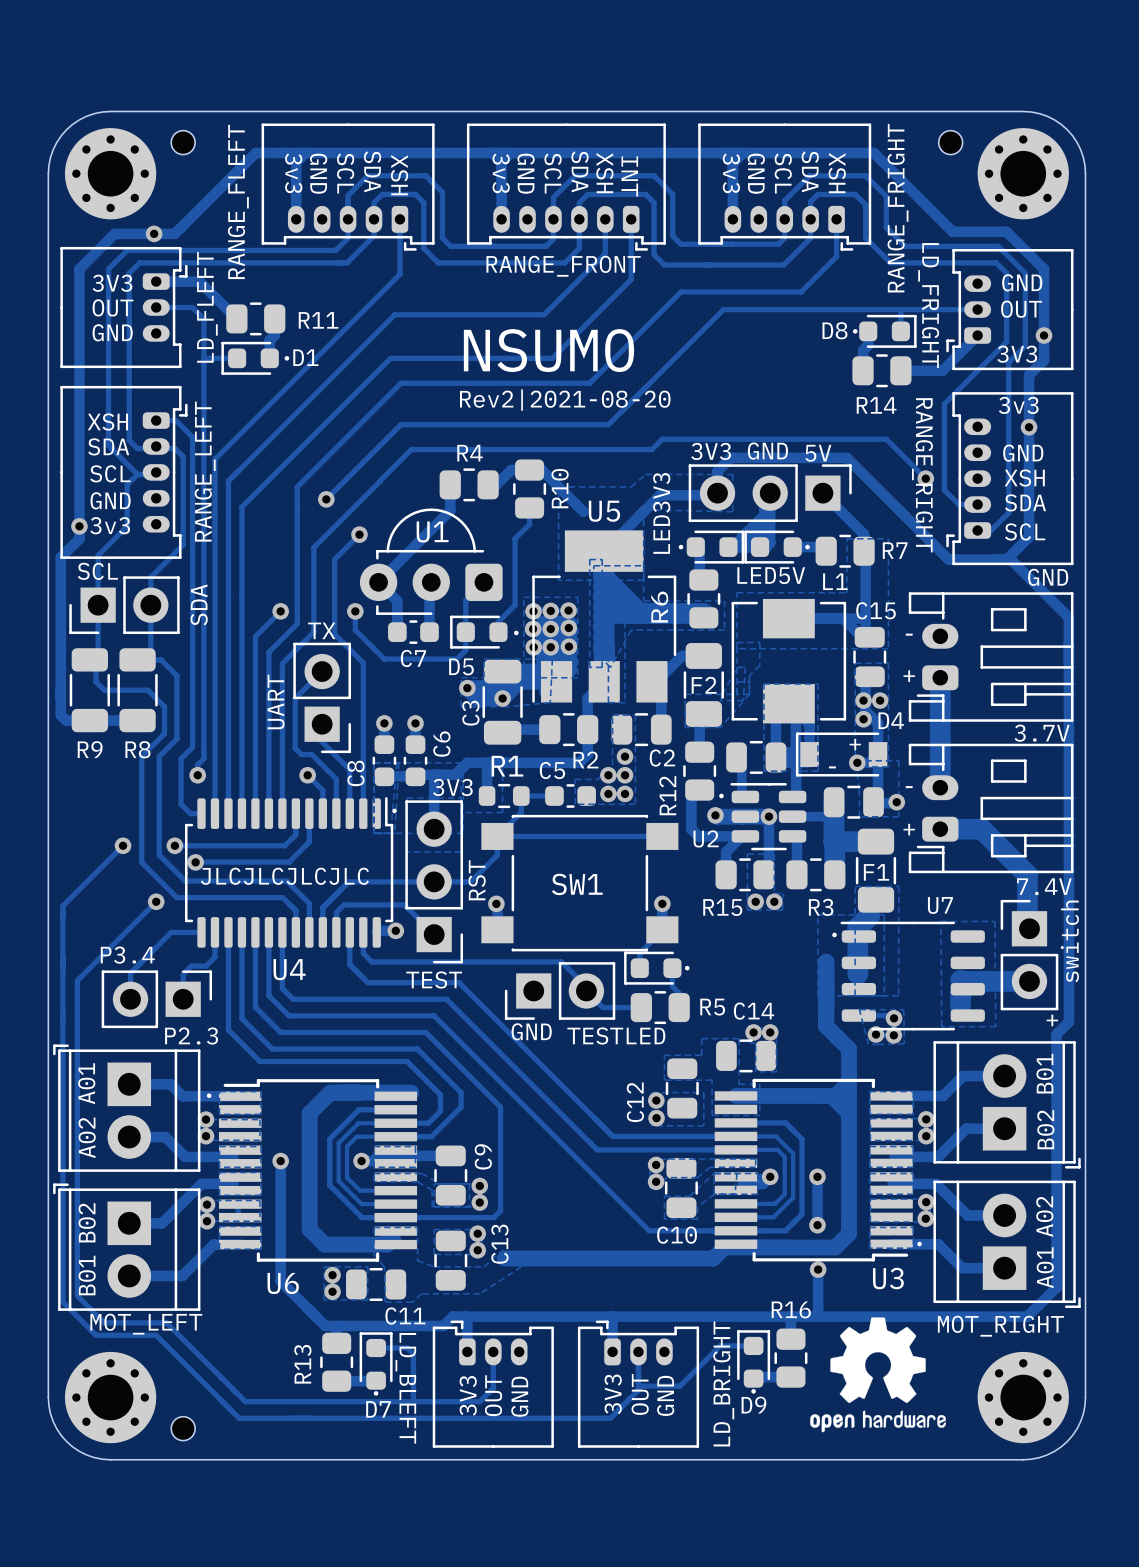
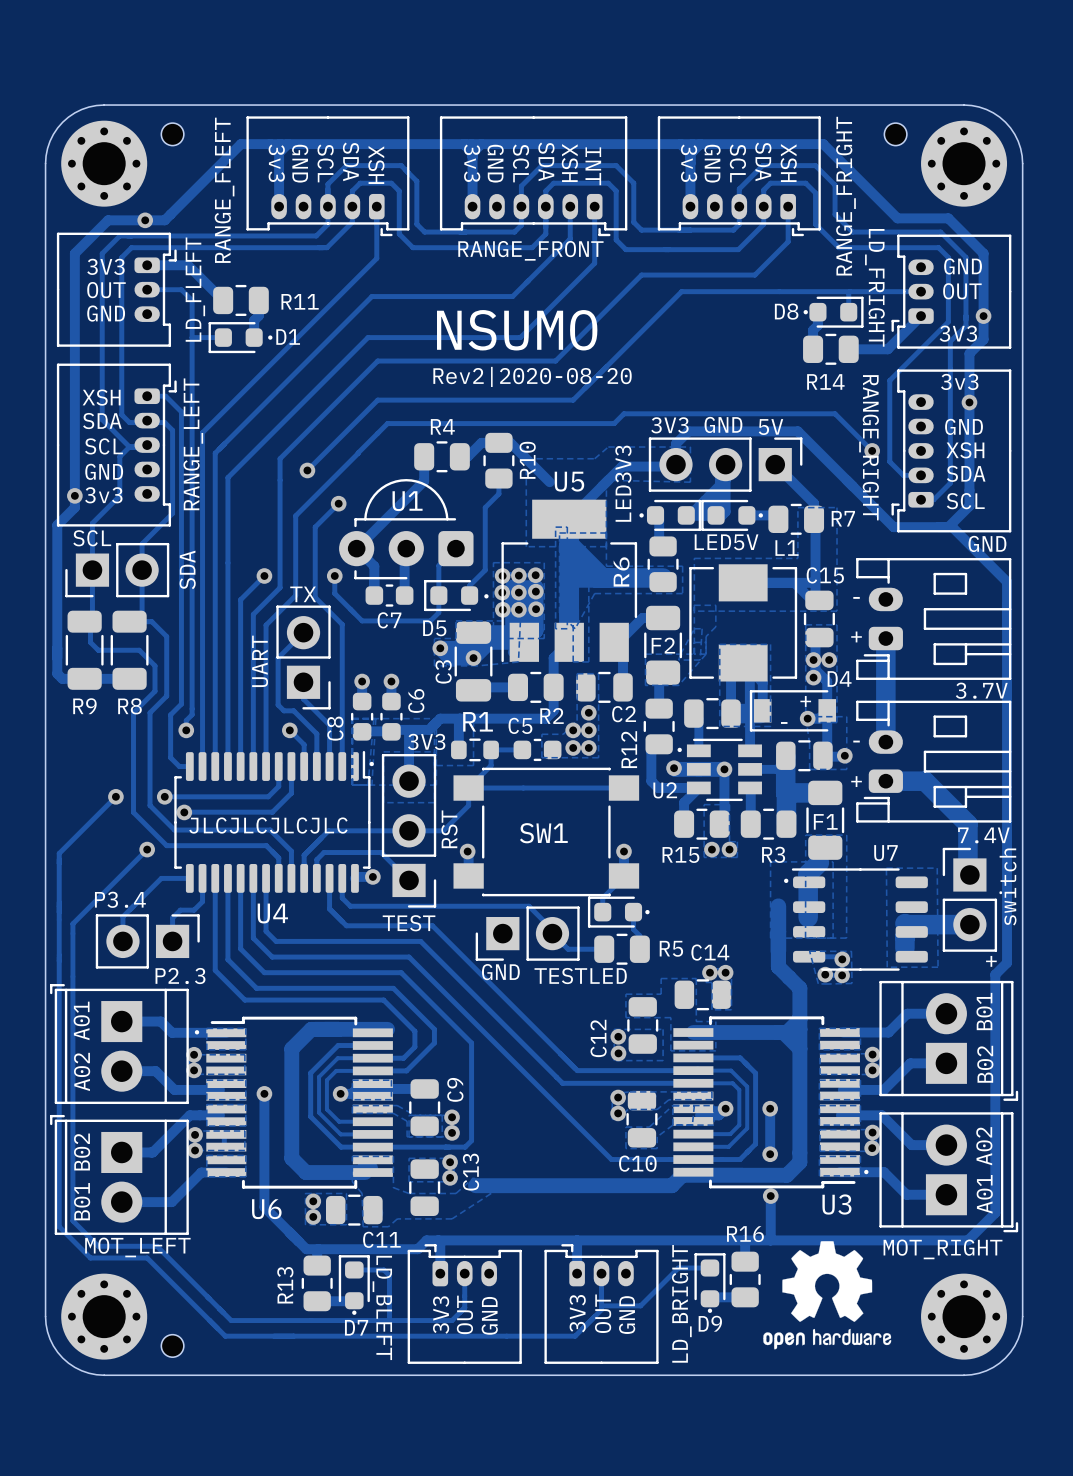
text: Rev2|2021-08-20 (565, 400) -> Rev2|2020-08-20 (532, 376)
U2 footprint: [730, 783, 807, 851] -> [686, 738, 762, 802]

